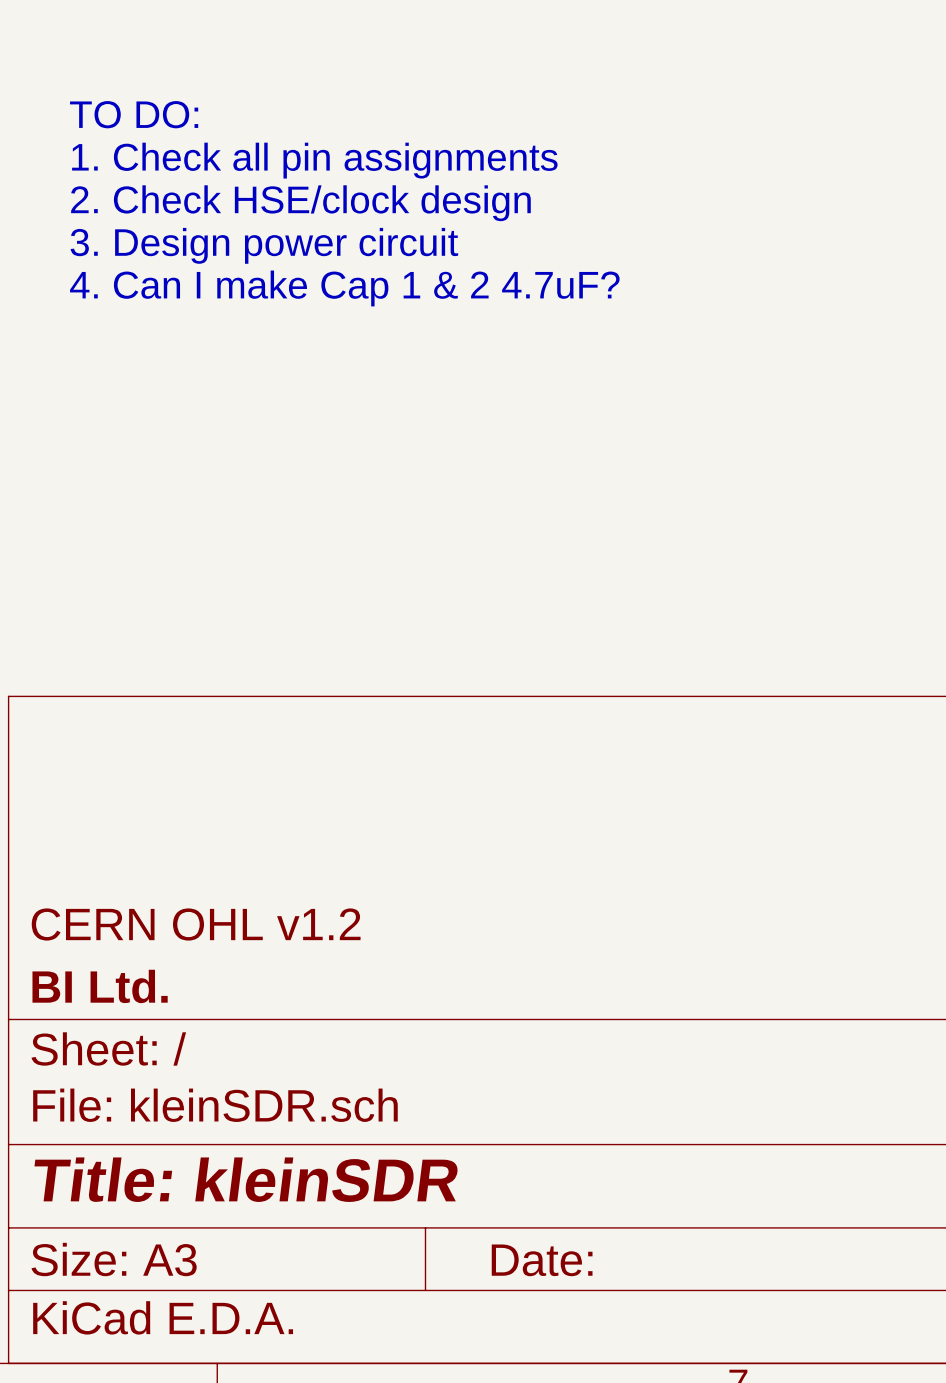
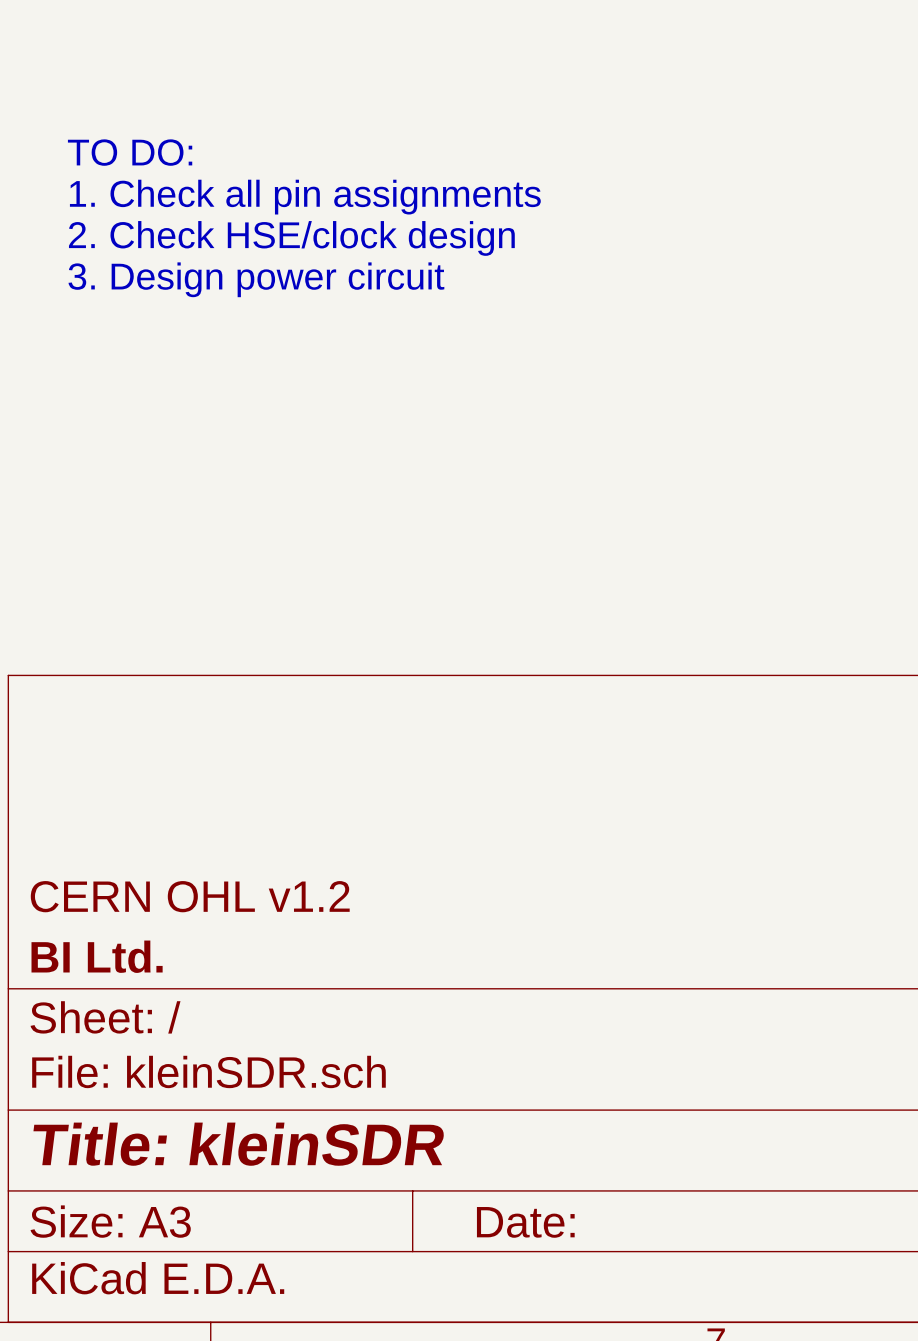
text: TO DO: (134, 114) -> none
text: 1. Check all pin assignments (314, 160) -> TO DO: (130, 152)
text: 2. Check HSE/clock design (300, 203) -> 1. Check all pin assignments (305, 197)
text: 3. Design power circuit (264, 245) -> 2. Check HSE/clock design (291, 238)
text: 4. Can I make Cap 1 & 2 4.7uF? (344, 288) -> 3. Design power circuit (256, 279)

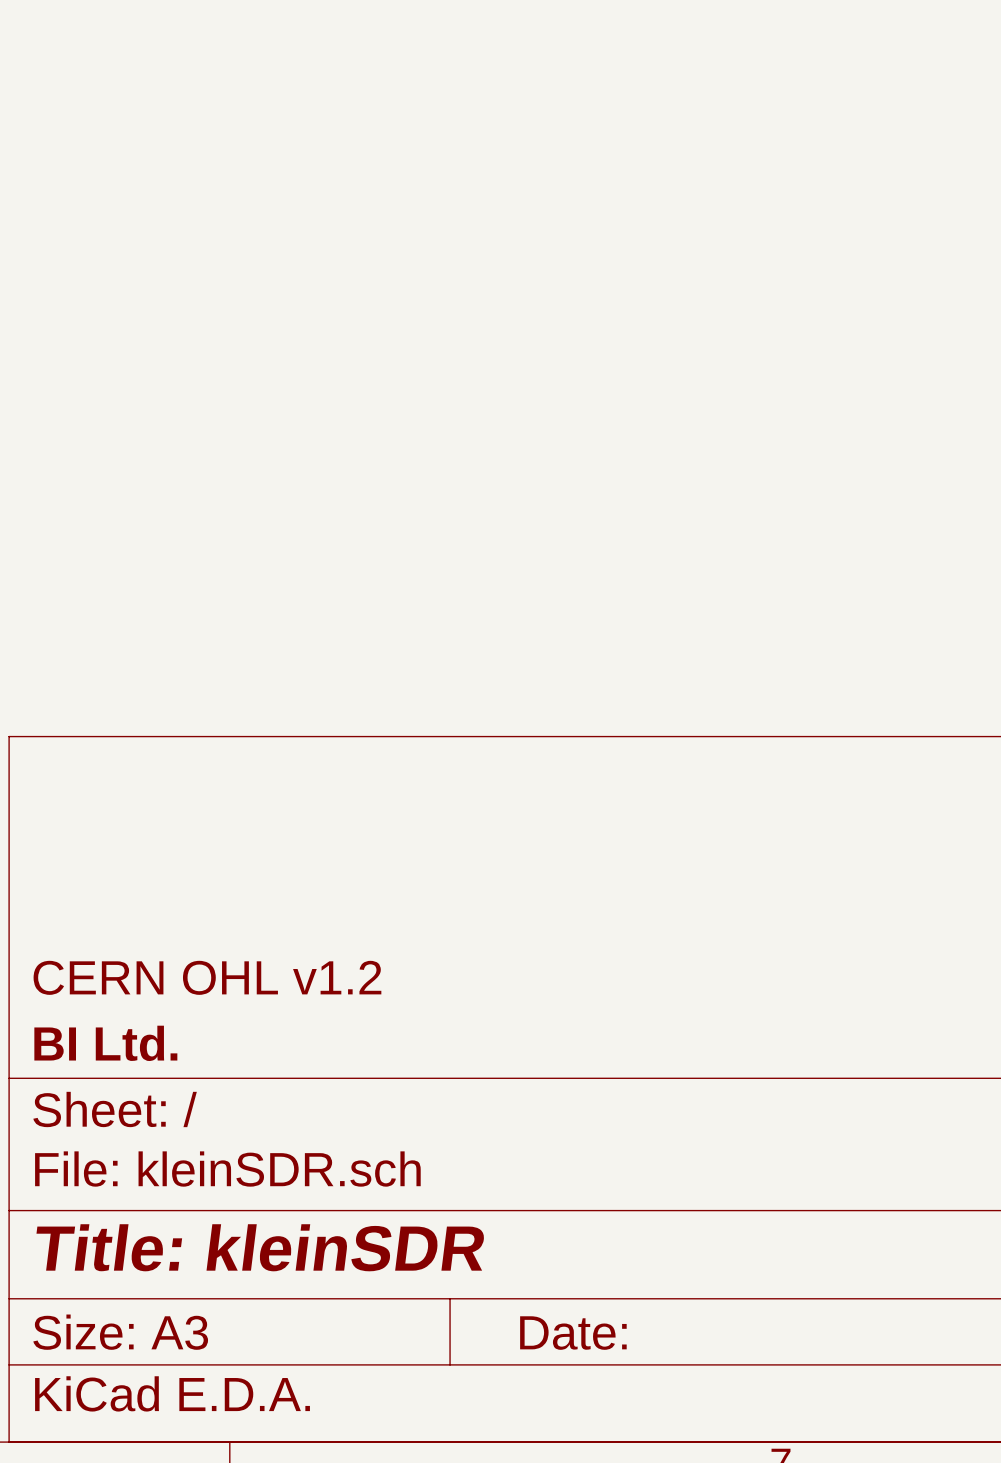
text: TO DO: (130, 152) -> none
text: 1. Check all pin assignments (305, 197) -> none
text: 2. Check HSE/clock design (291, 238) -> none
text: 3. Design power circuit (256, 279) -> none

